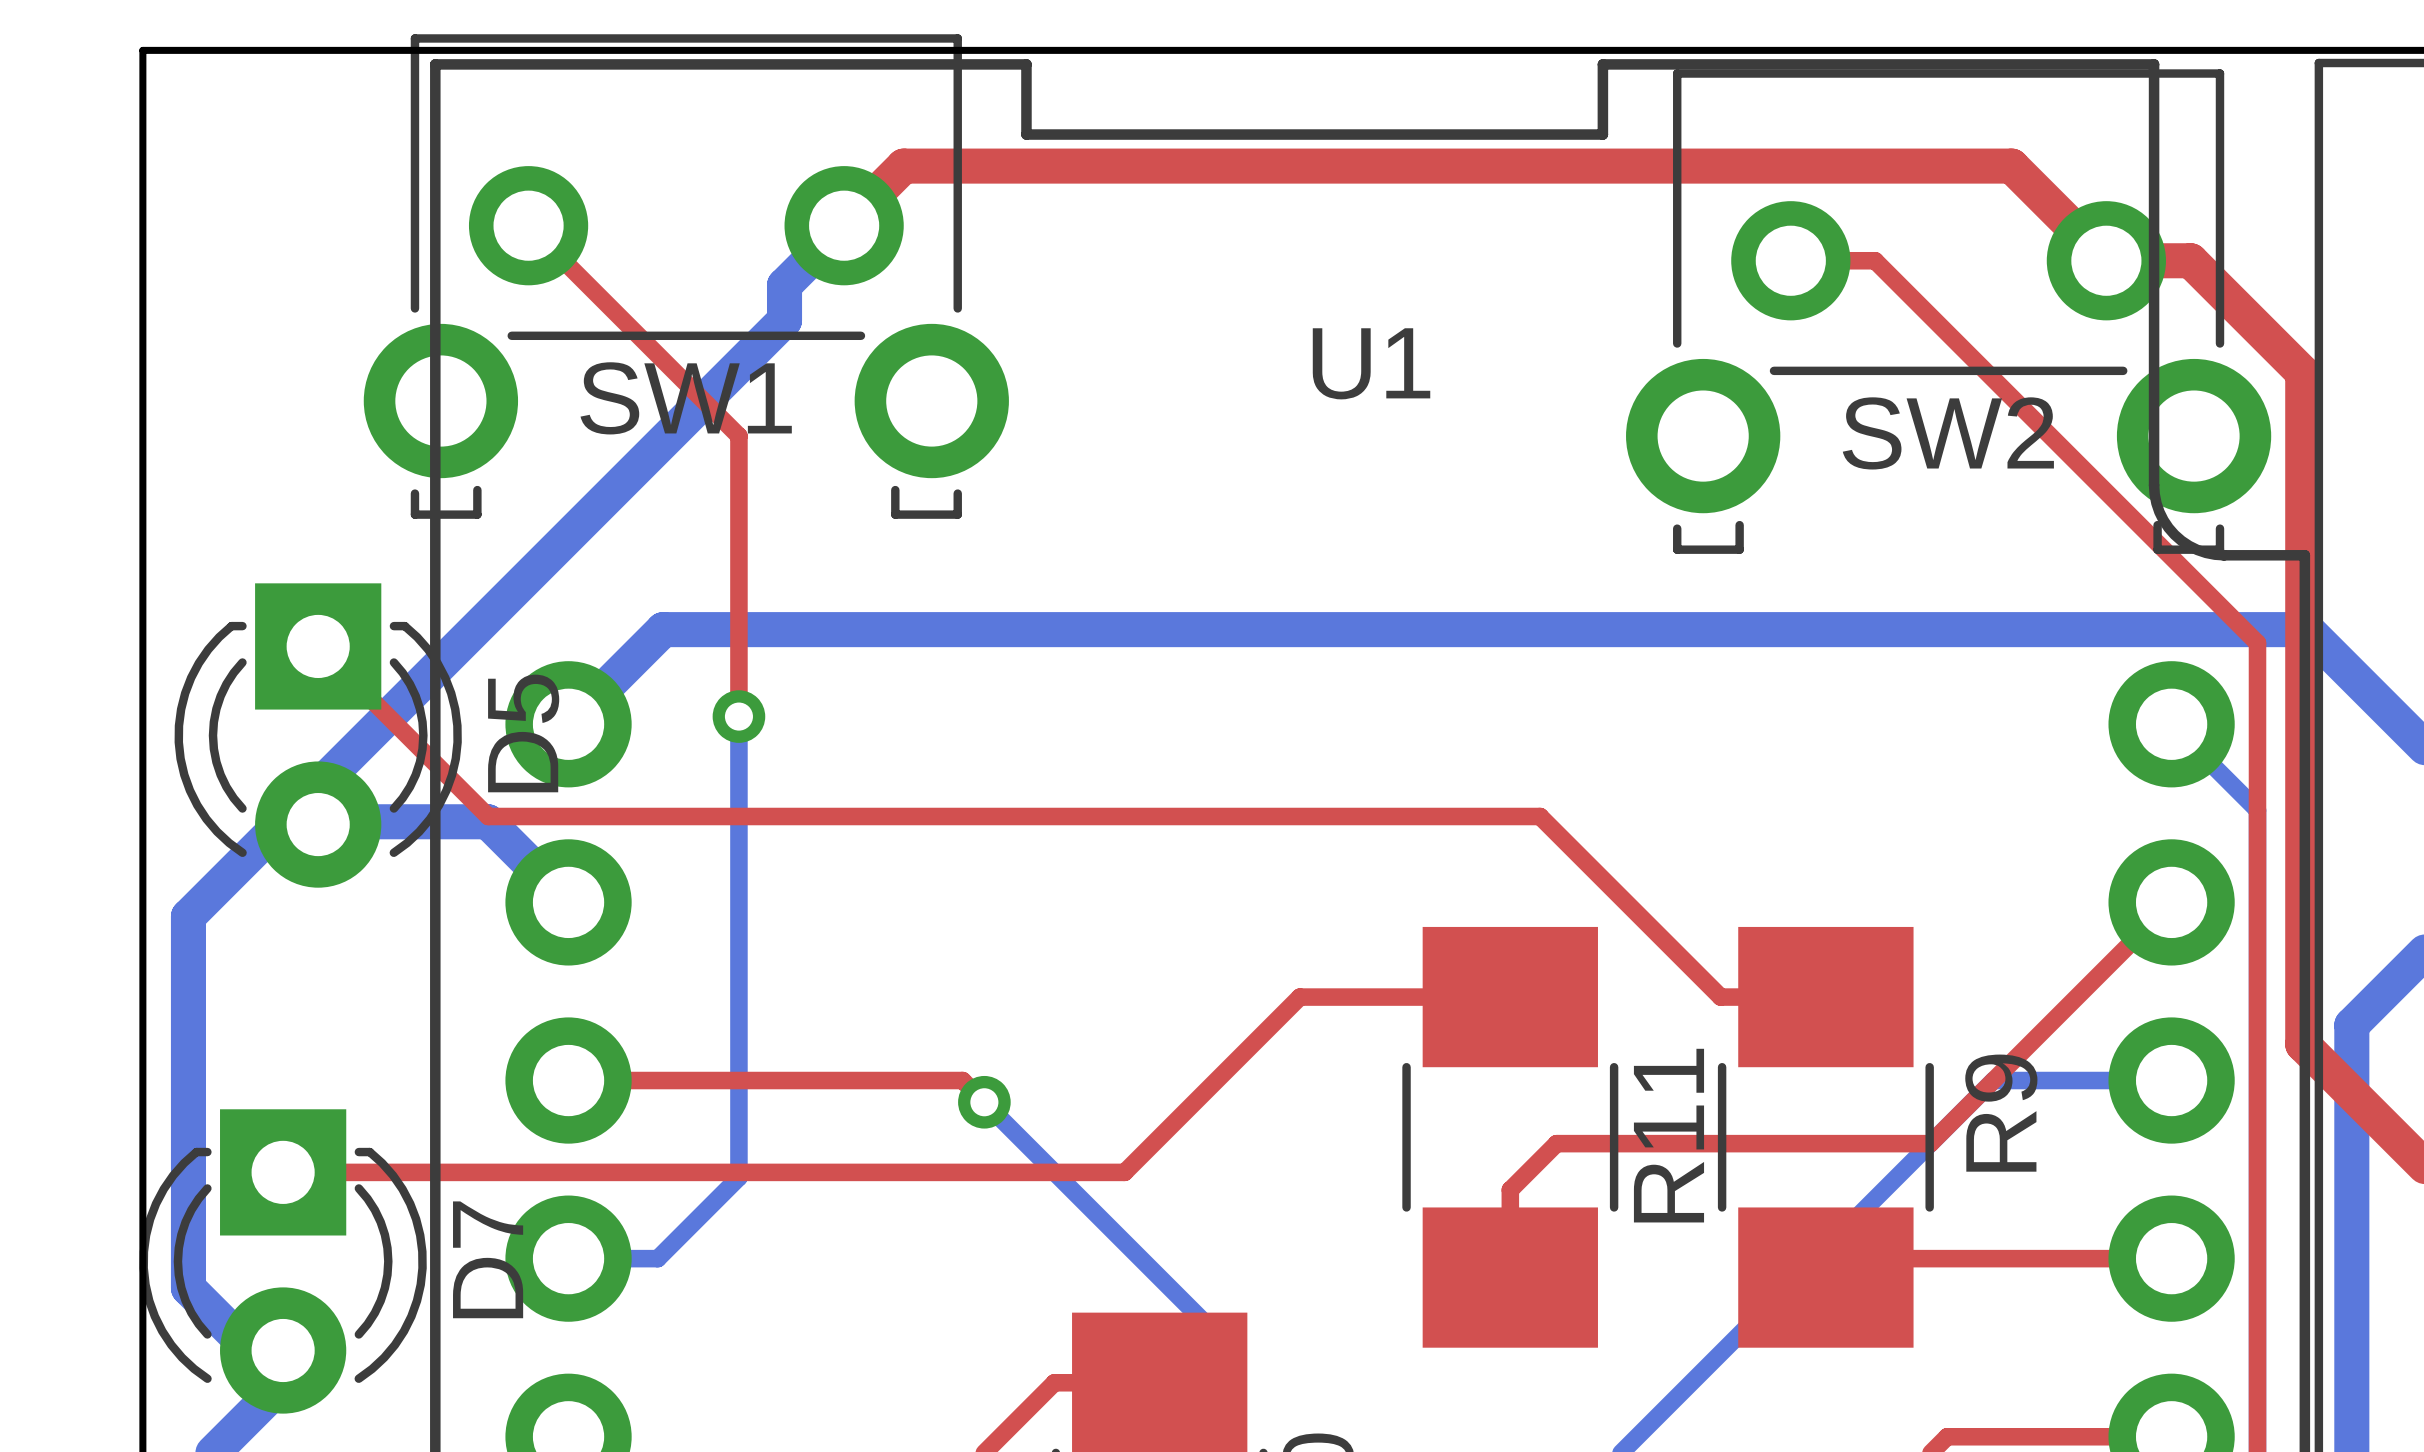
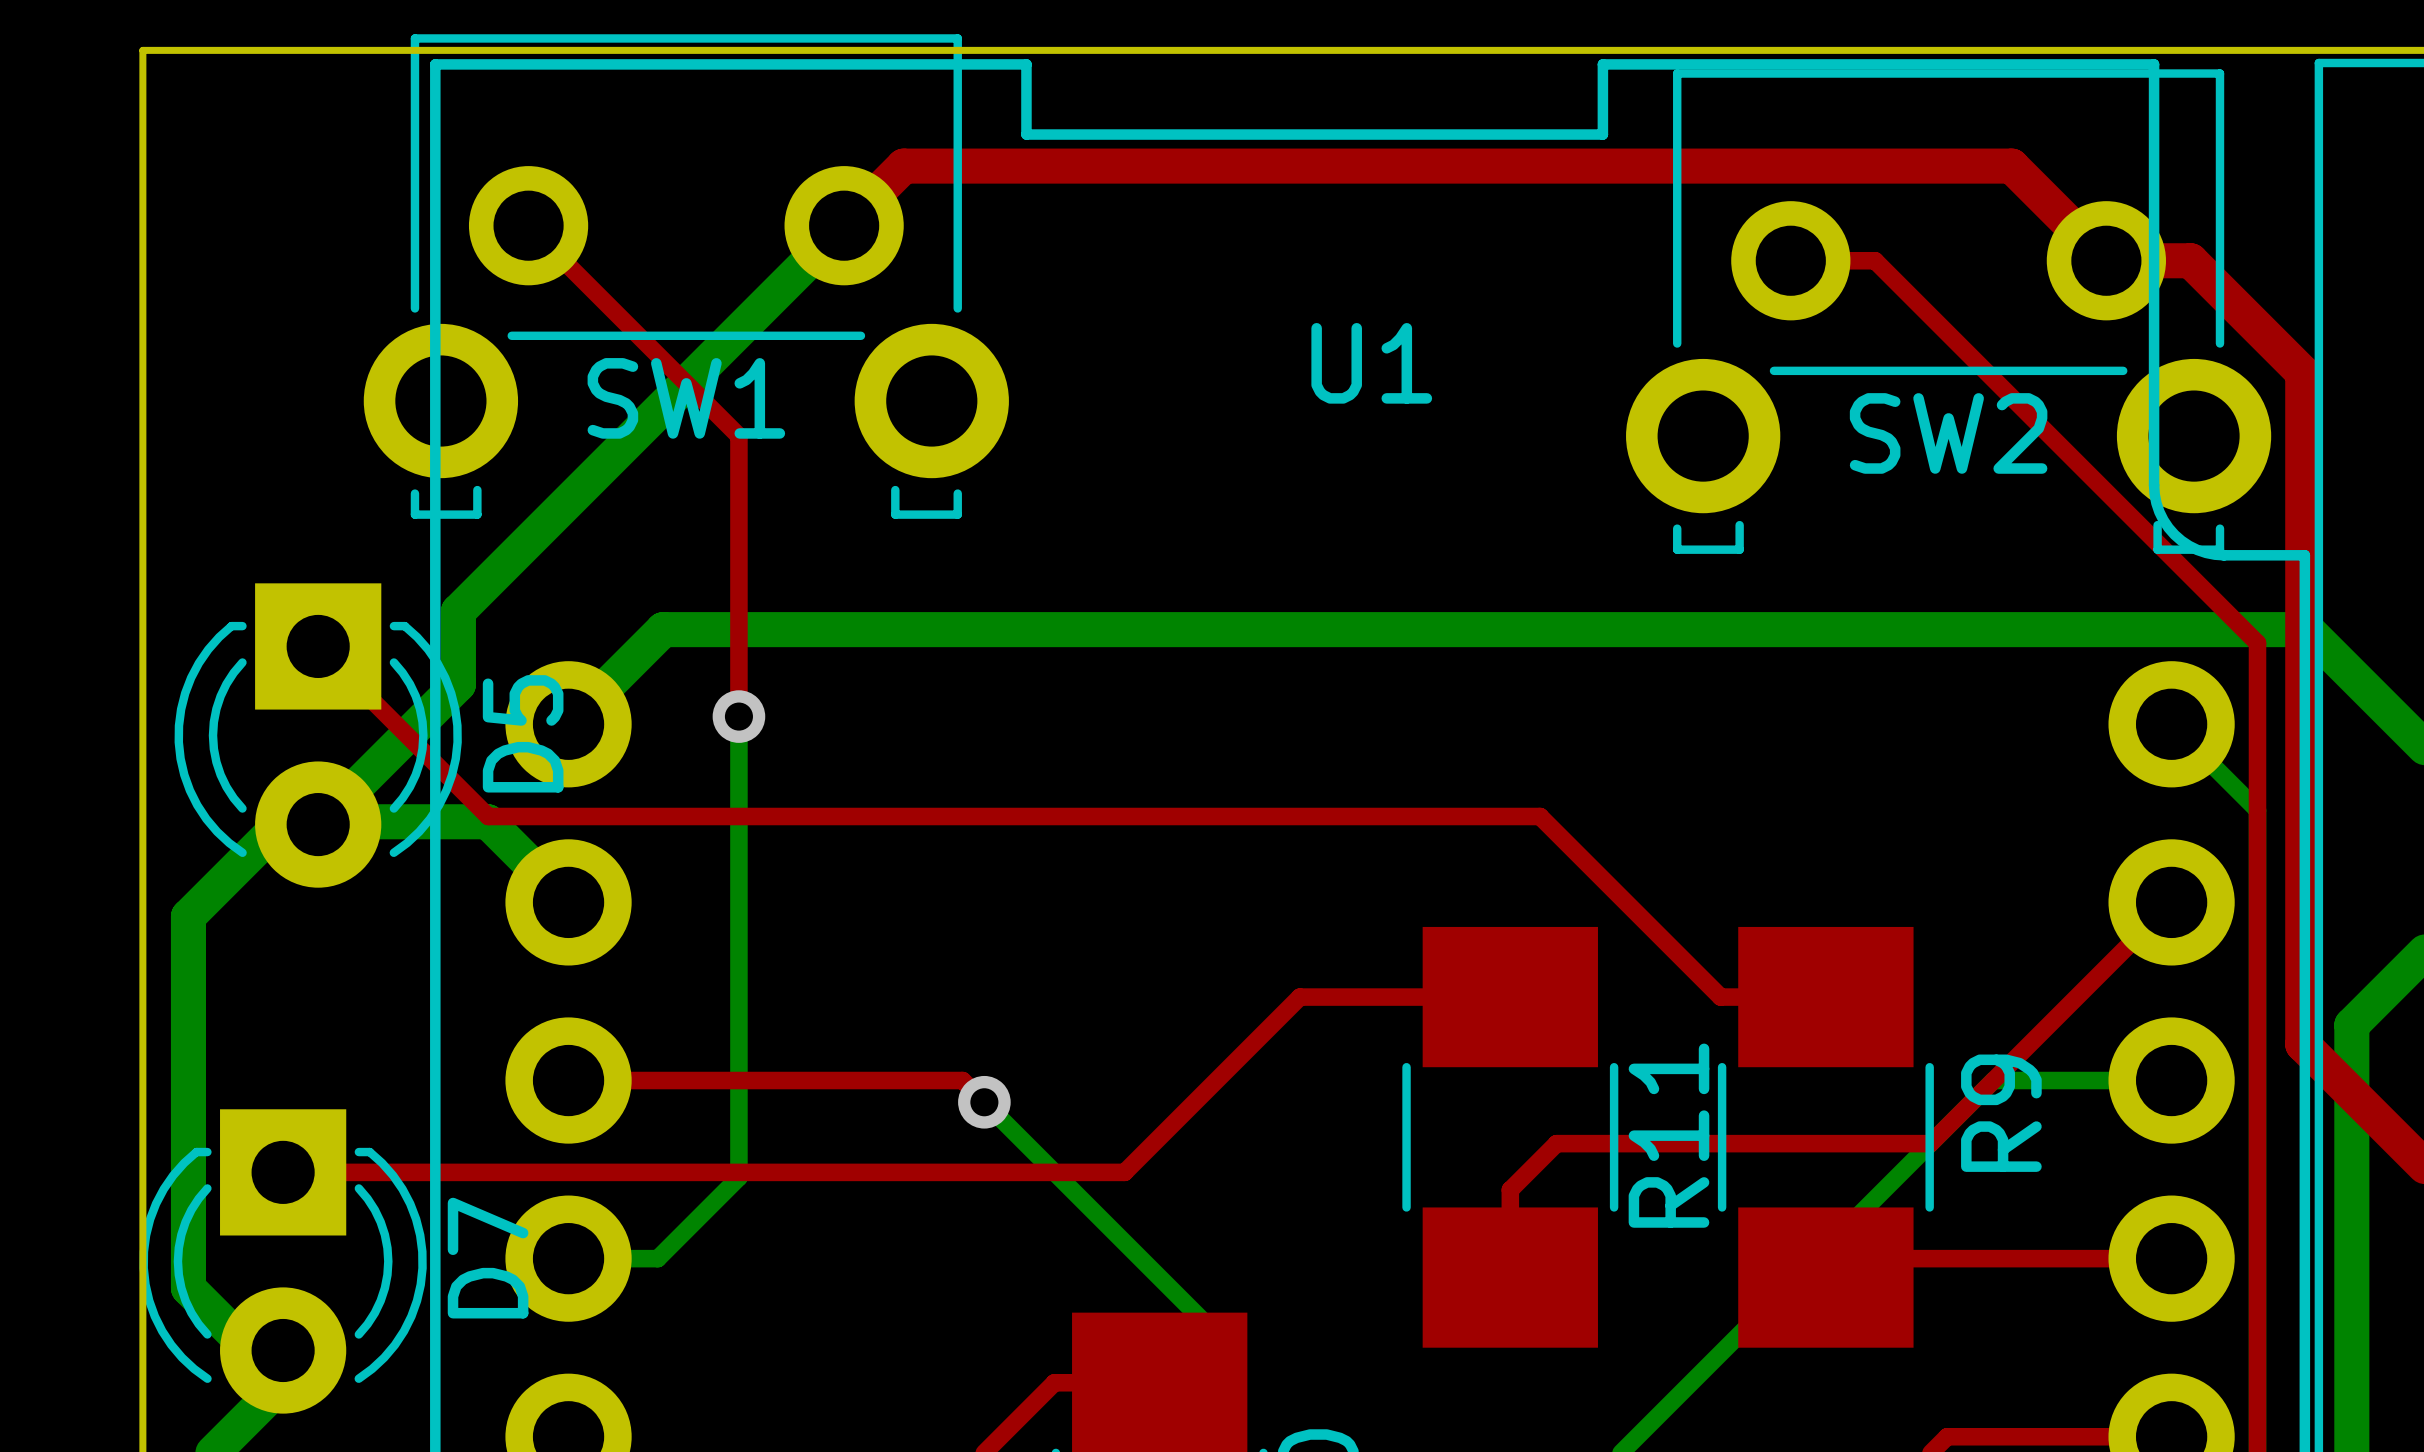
bottom track: (784, 285) (784, 320) (283, 821) -> (784, 285) (458, 611) (458, 684) (318, 824)

